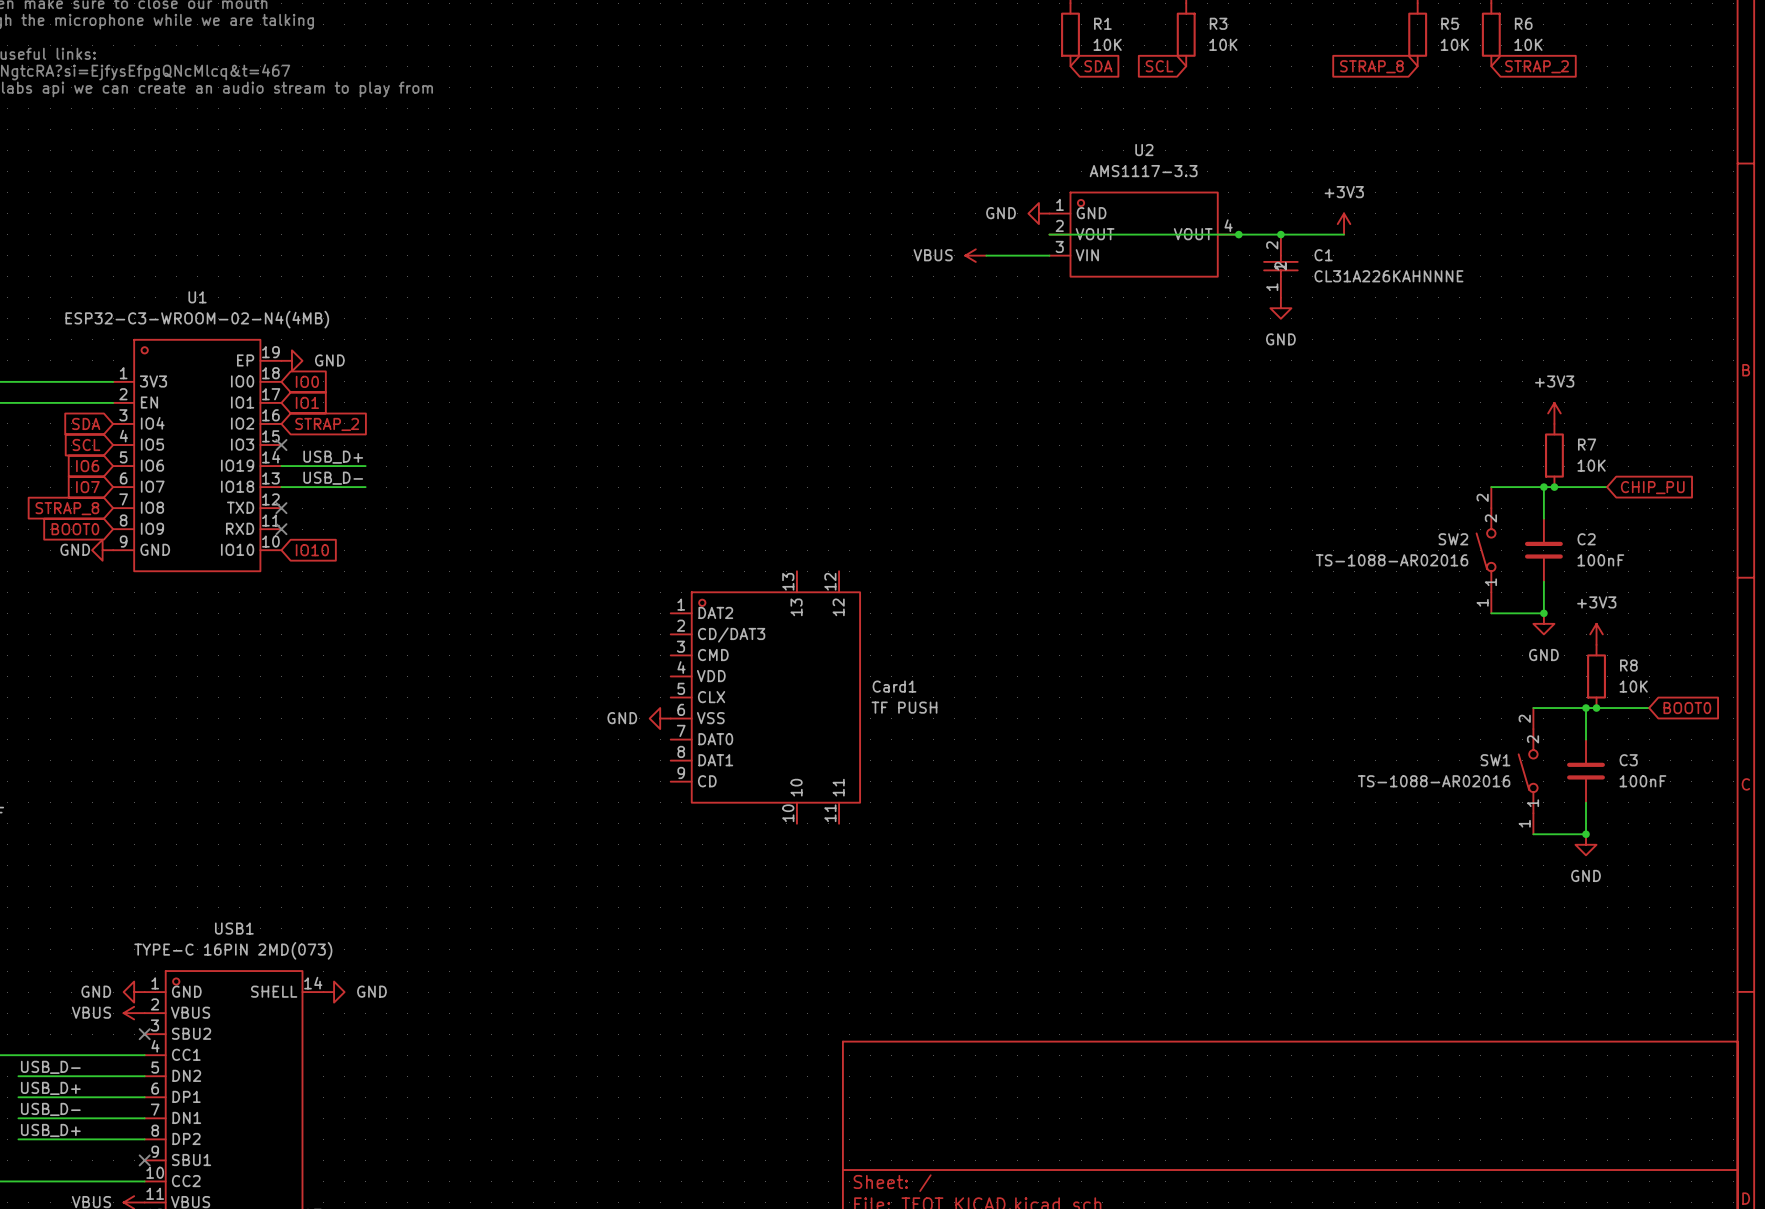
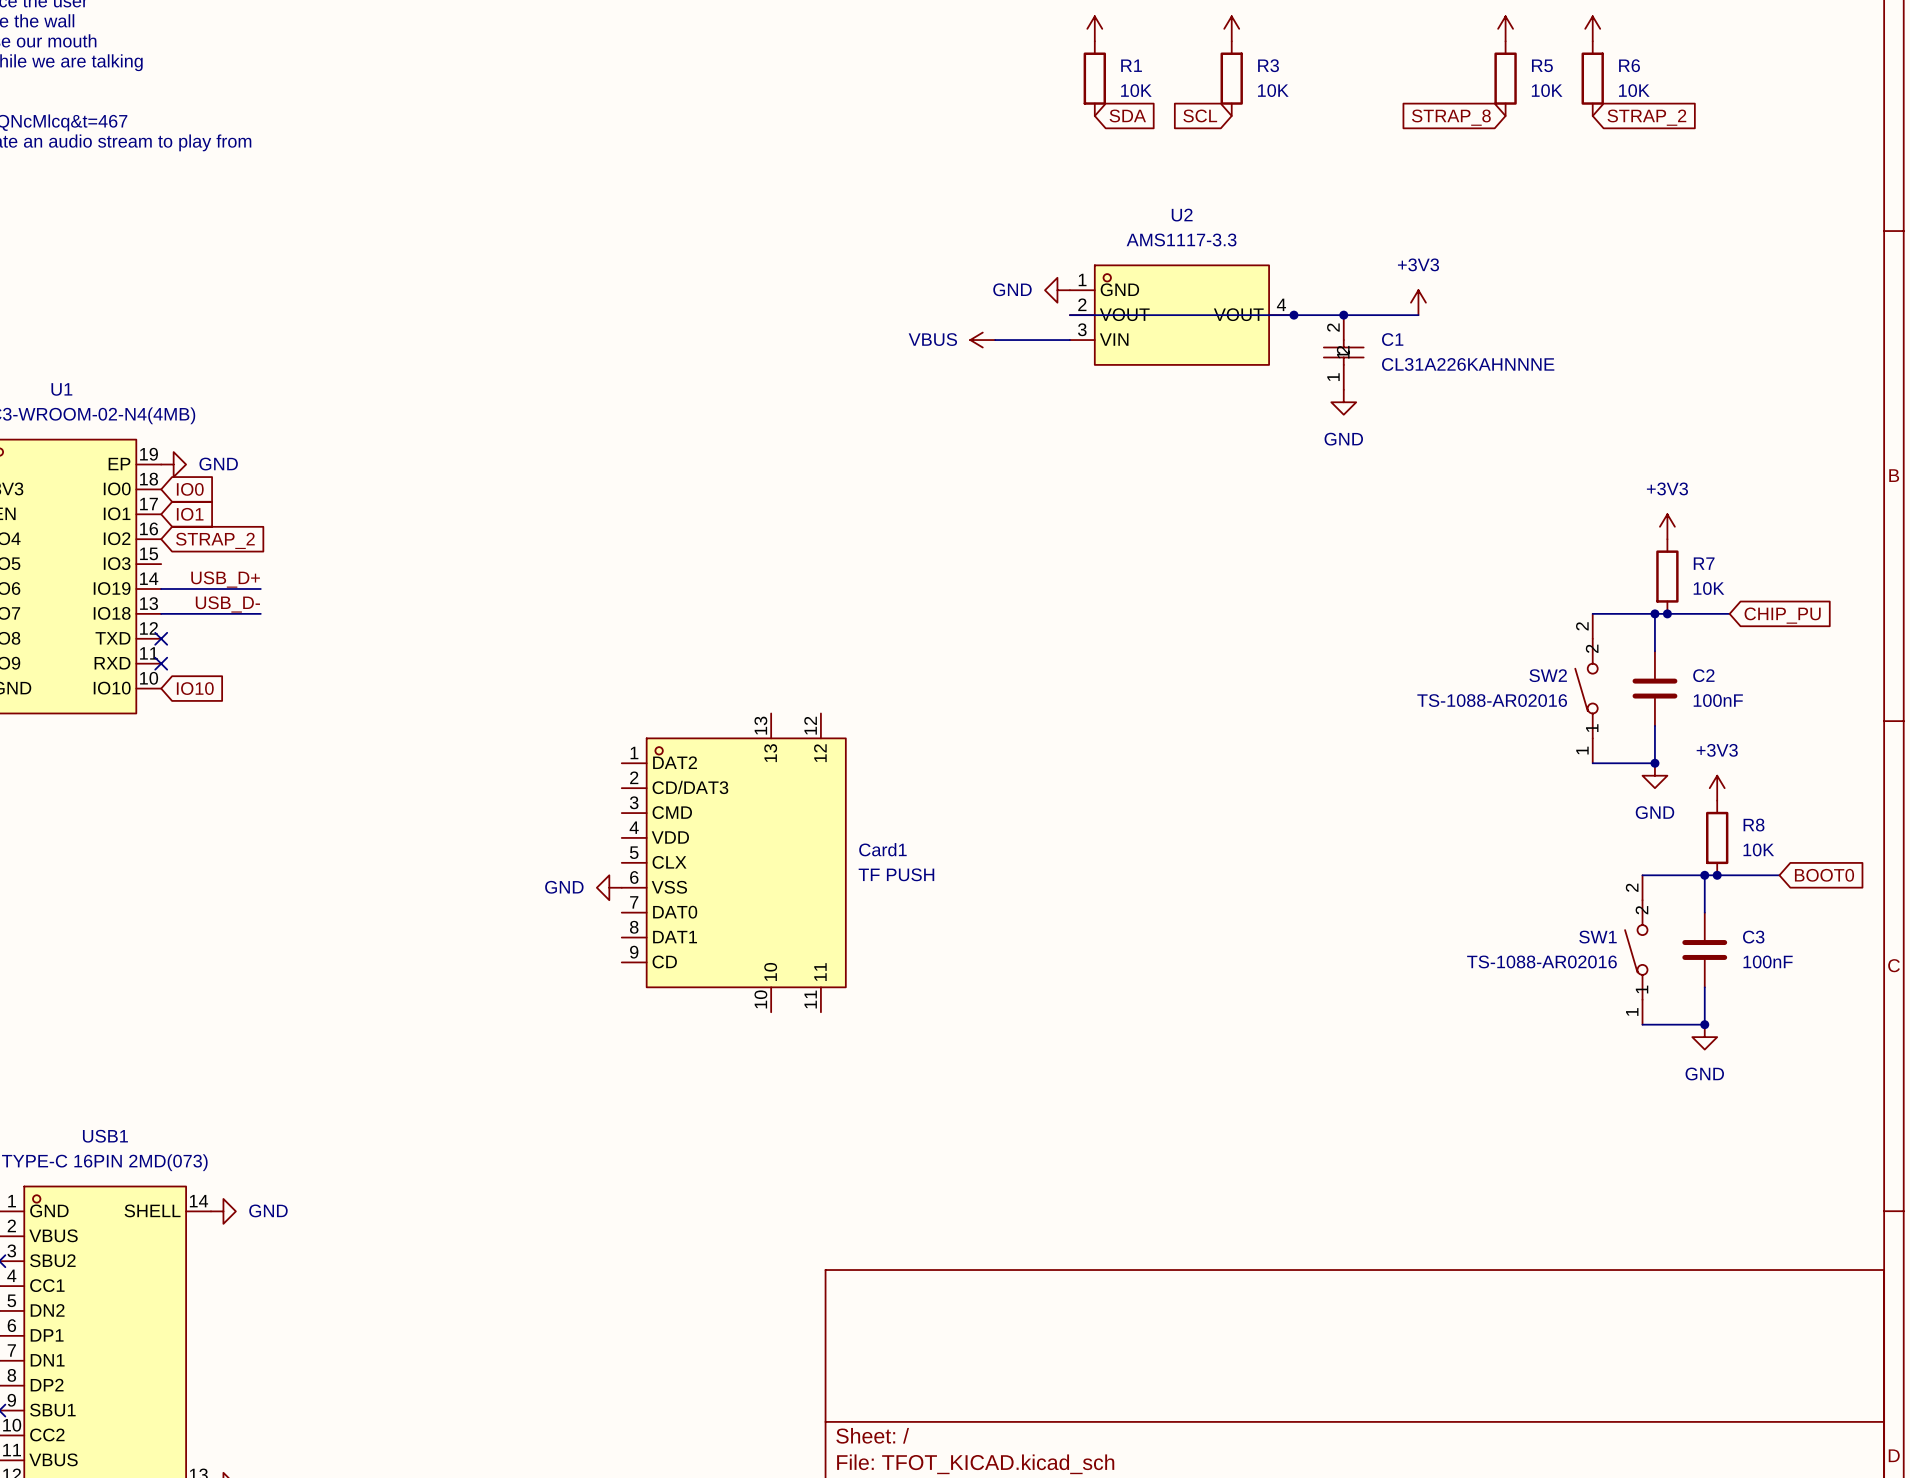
no-connect mark: (281, 445) -> none

